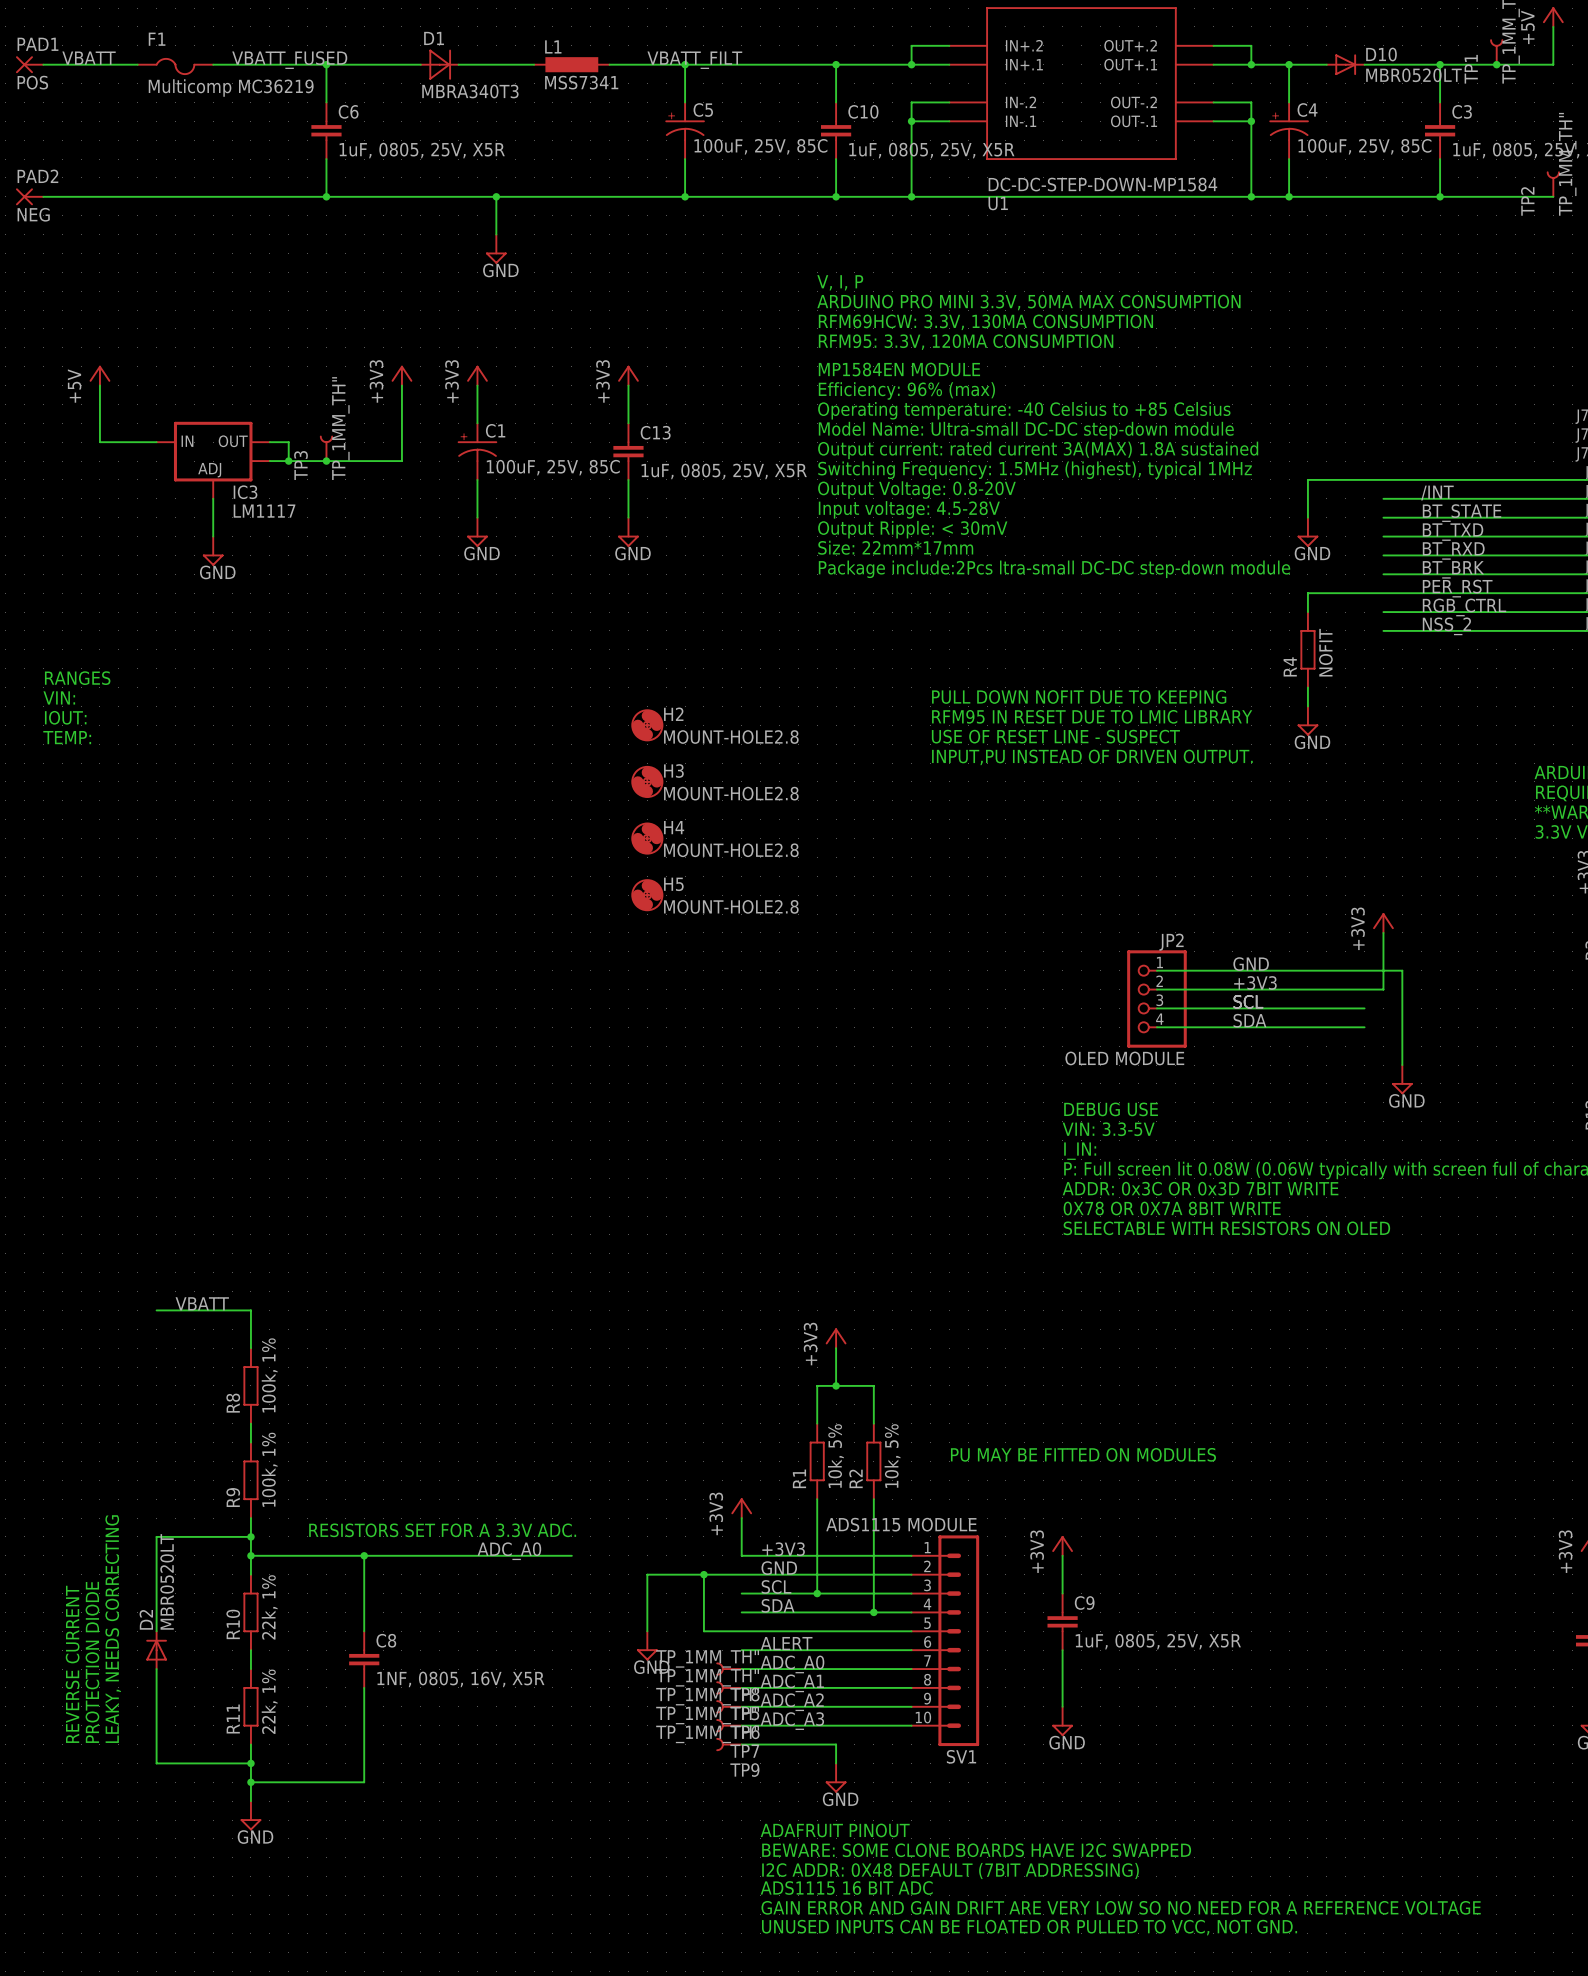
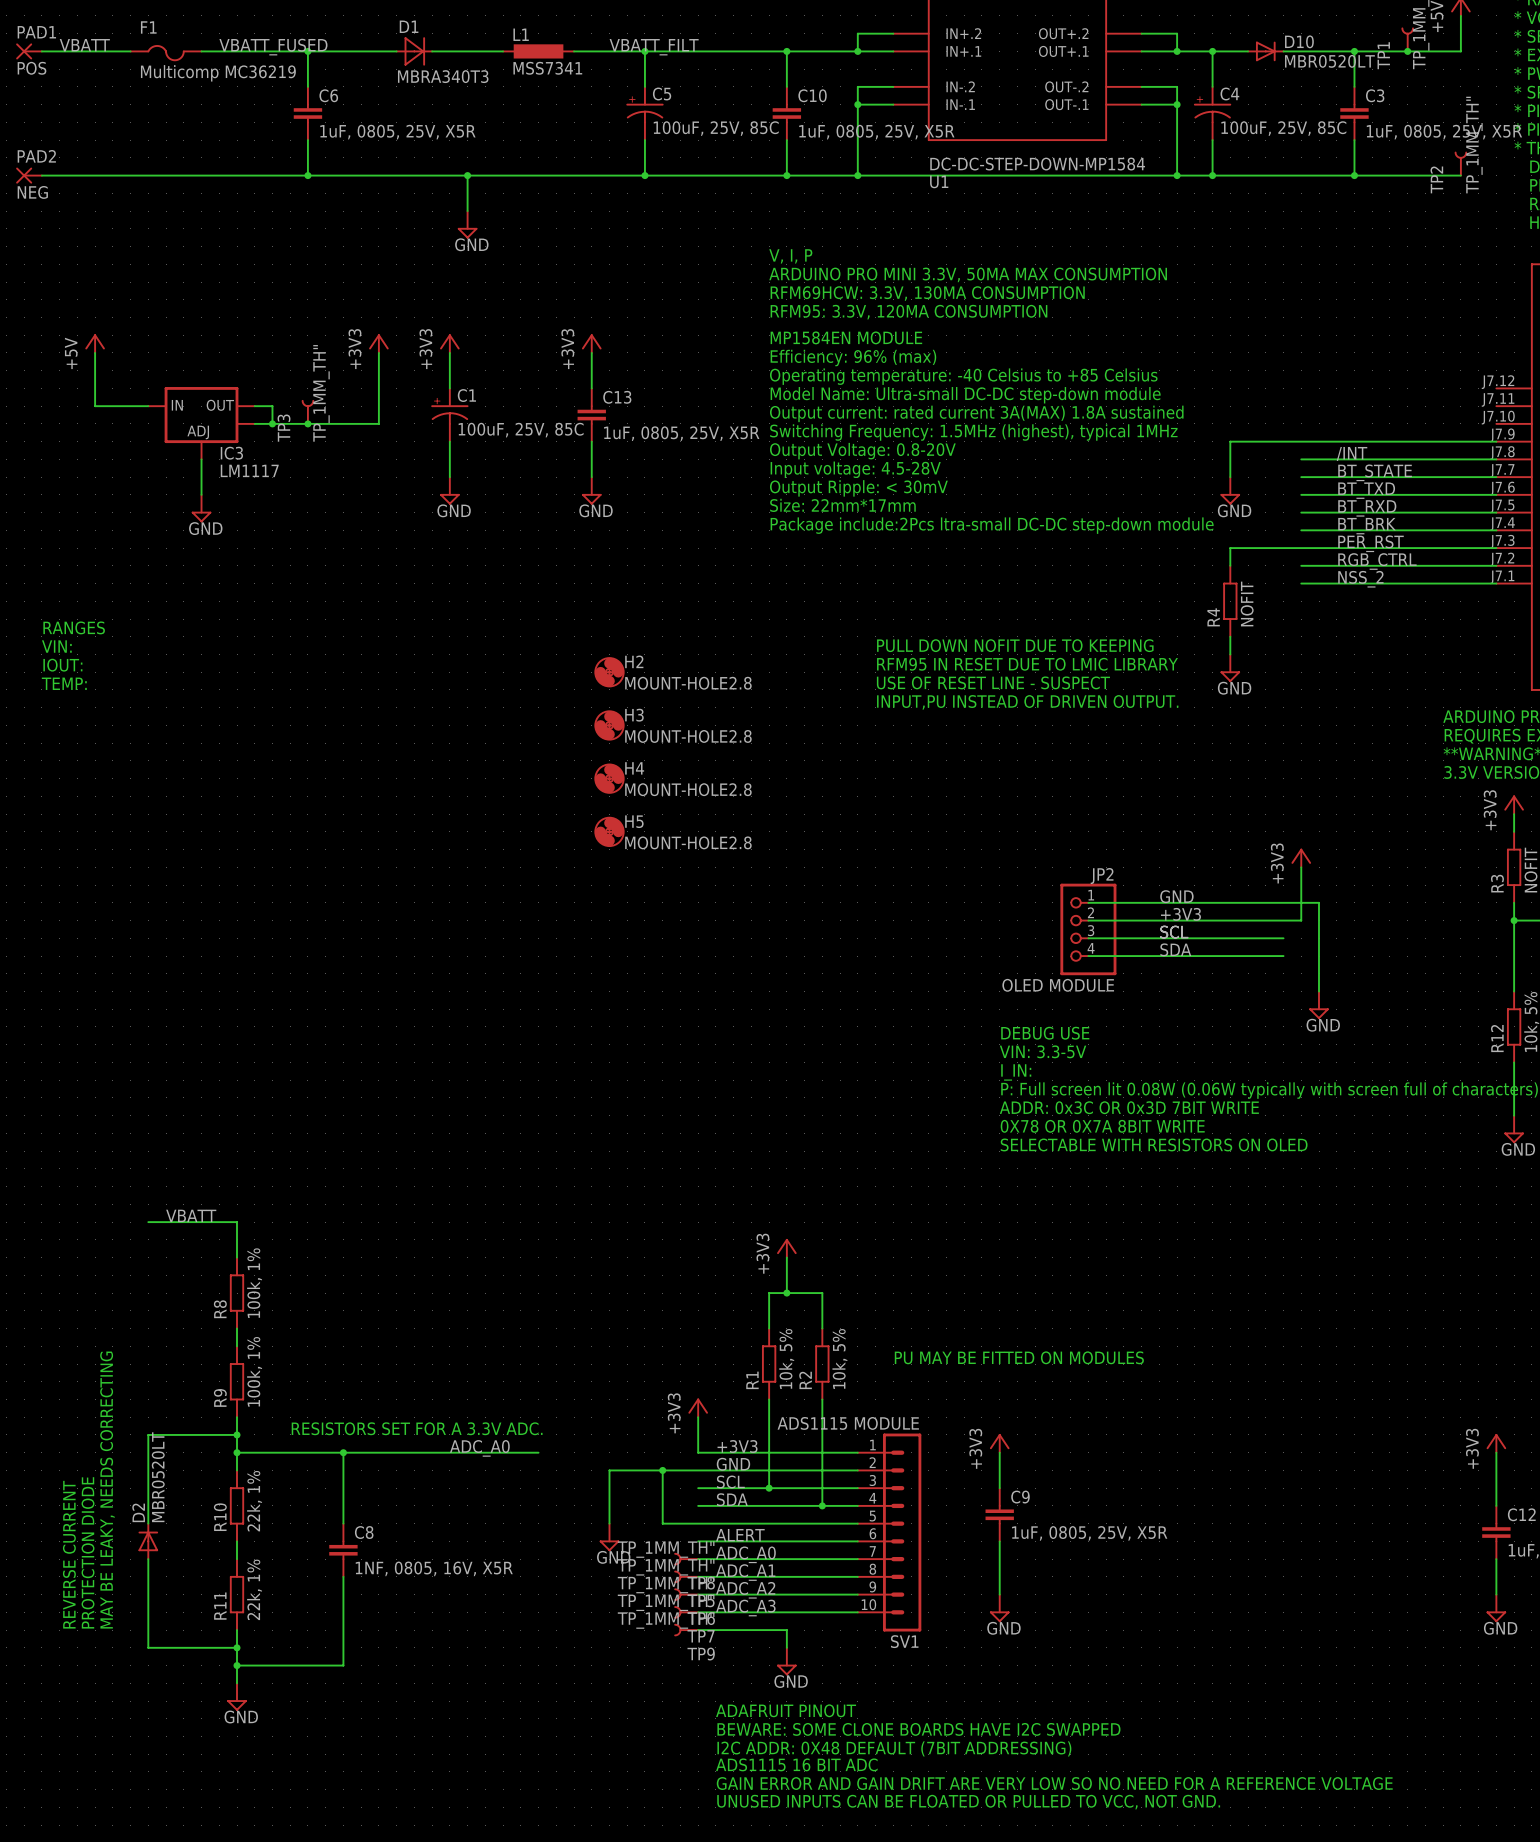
text: LEAKY, NEEDS CORRECTING (113, 1629) -> MAY BE LEAKY, NEEDS CORRECTING (107, 1490)

